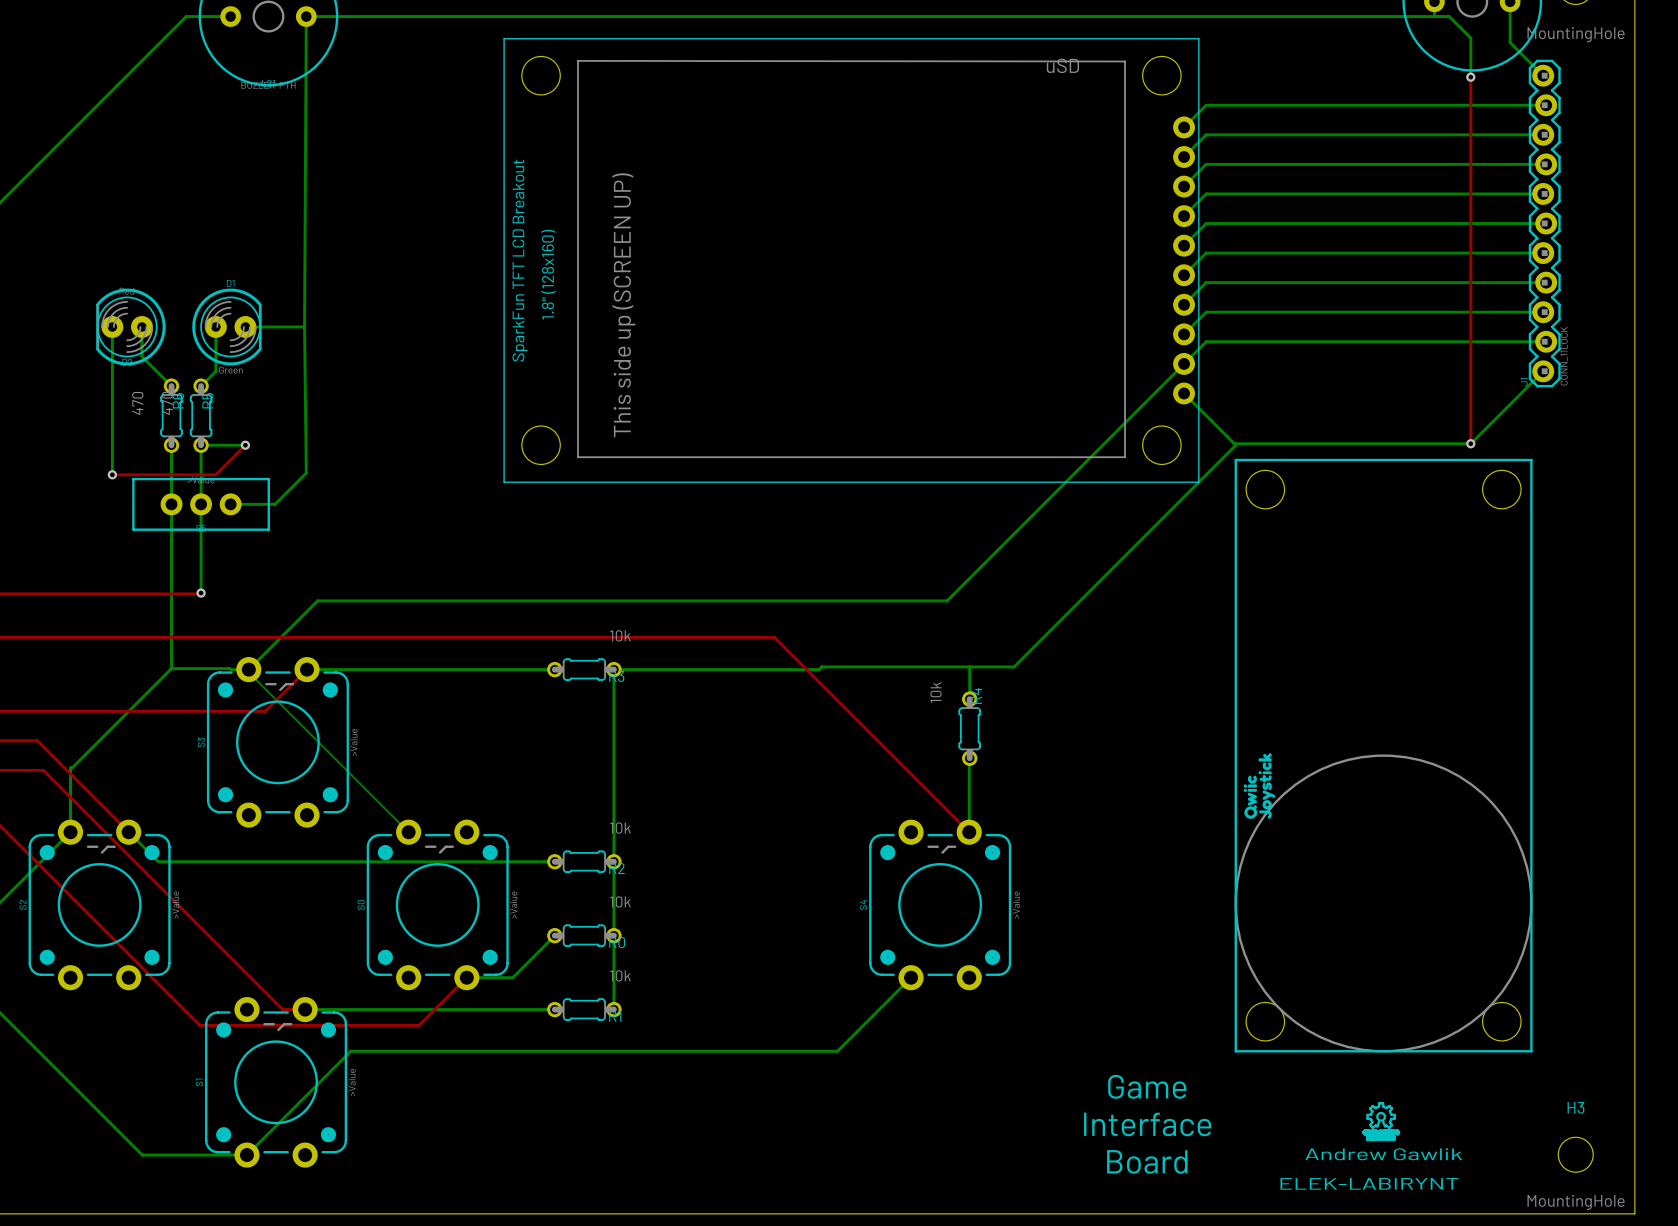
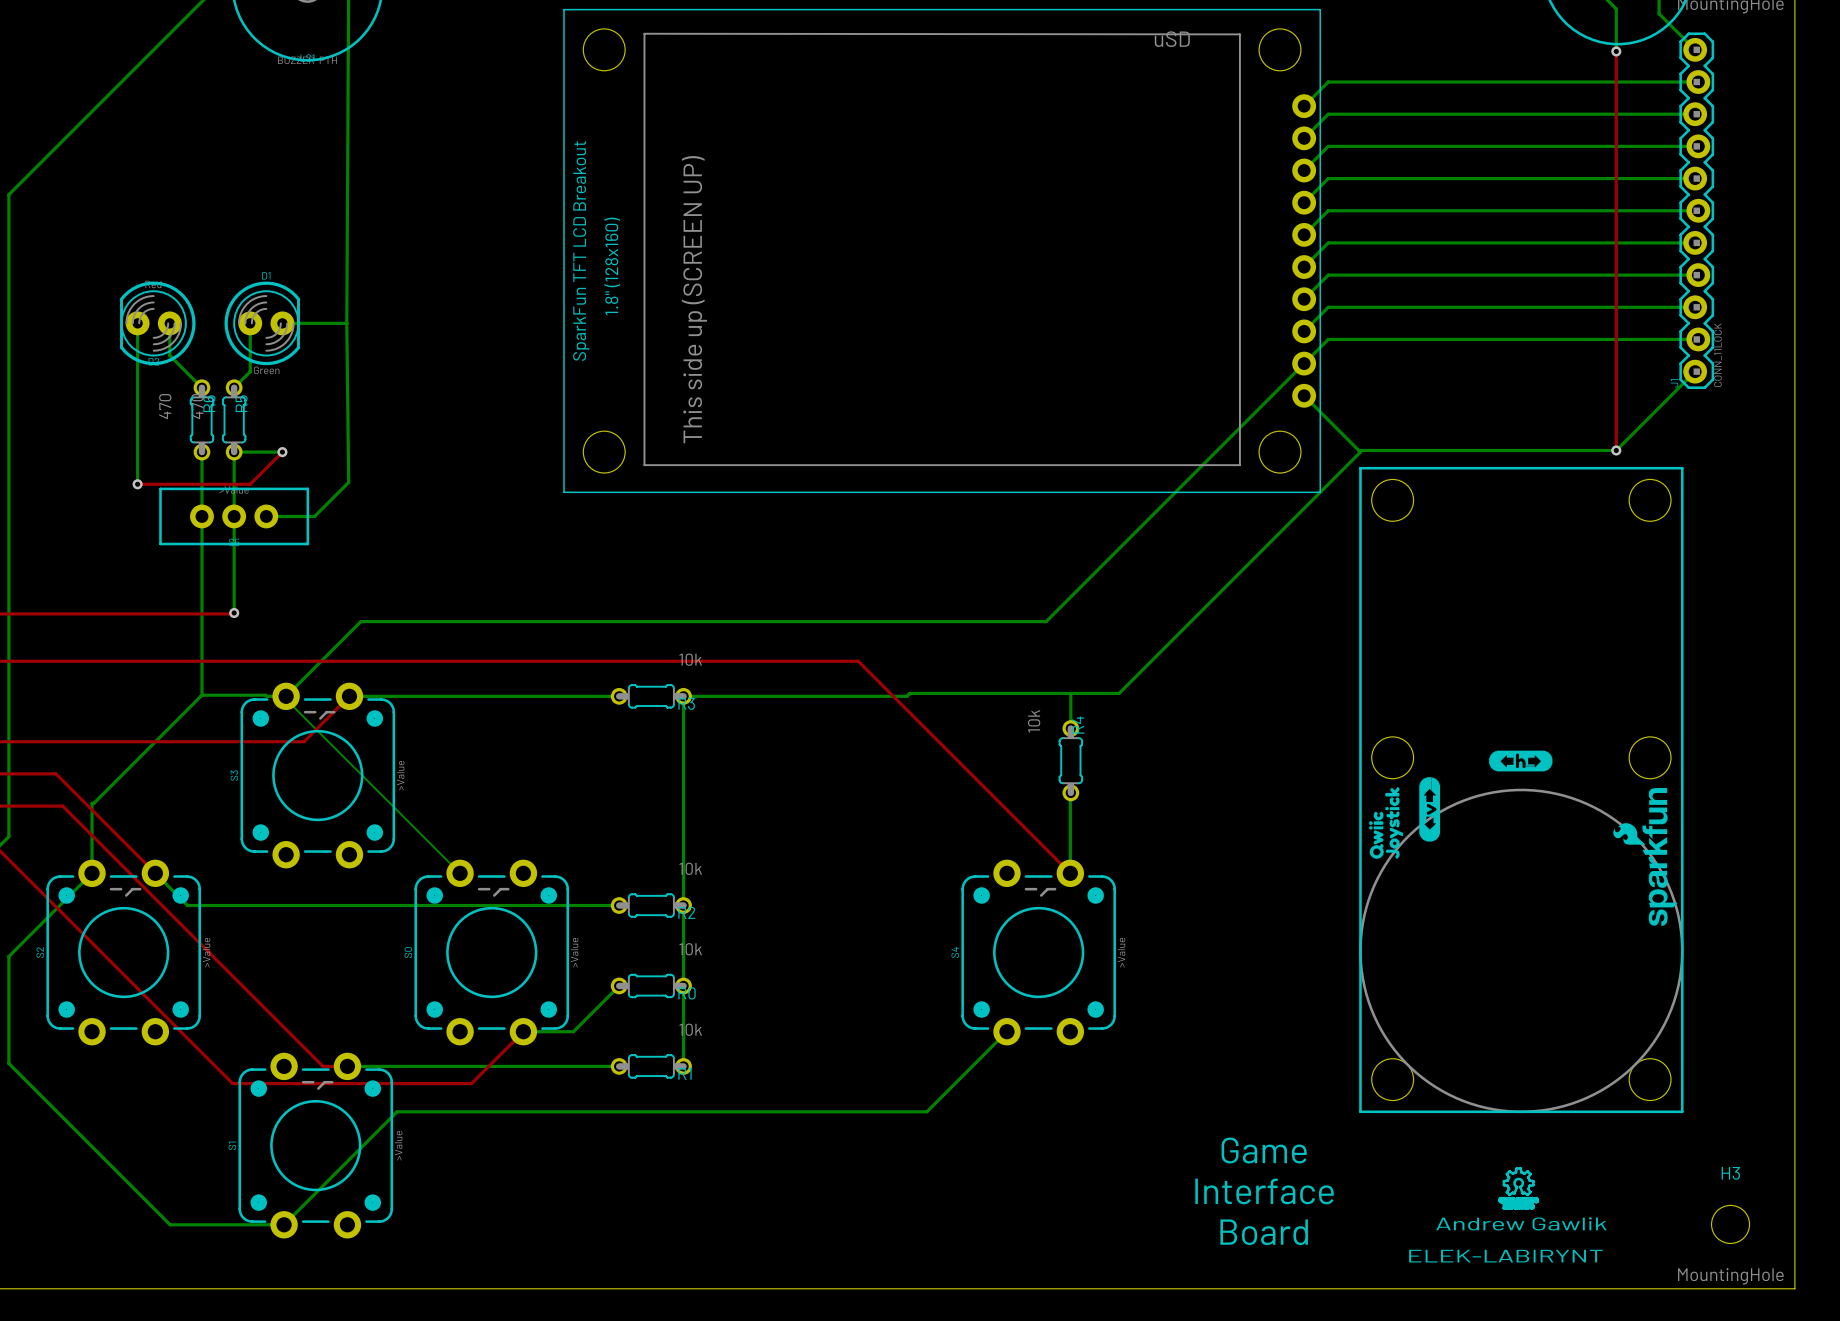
part footprint: [1234, 458, 1533, 1053] -> [1359, 466, 1684, 1114]

